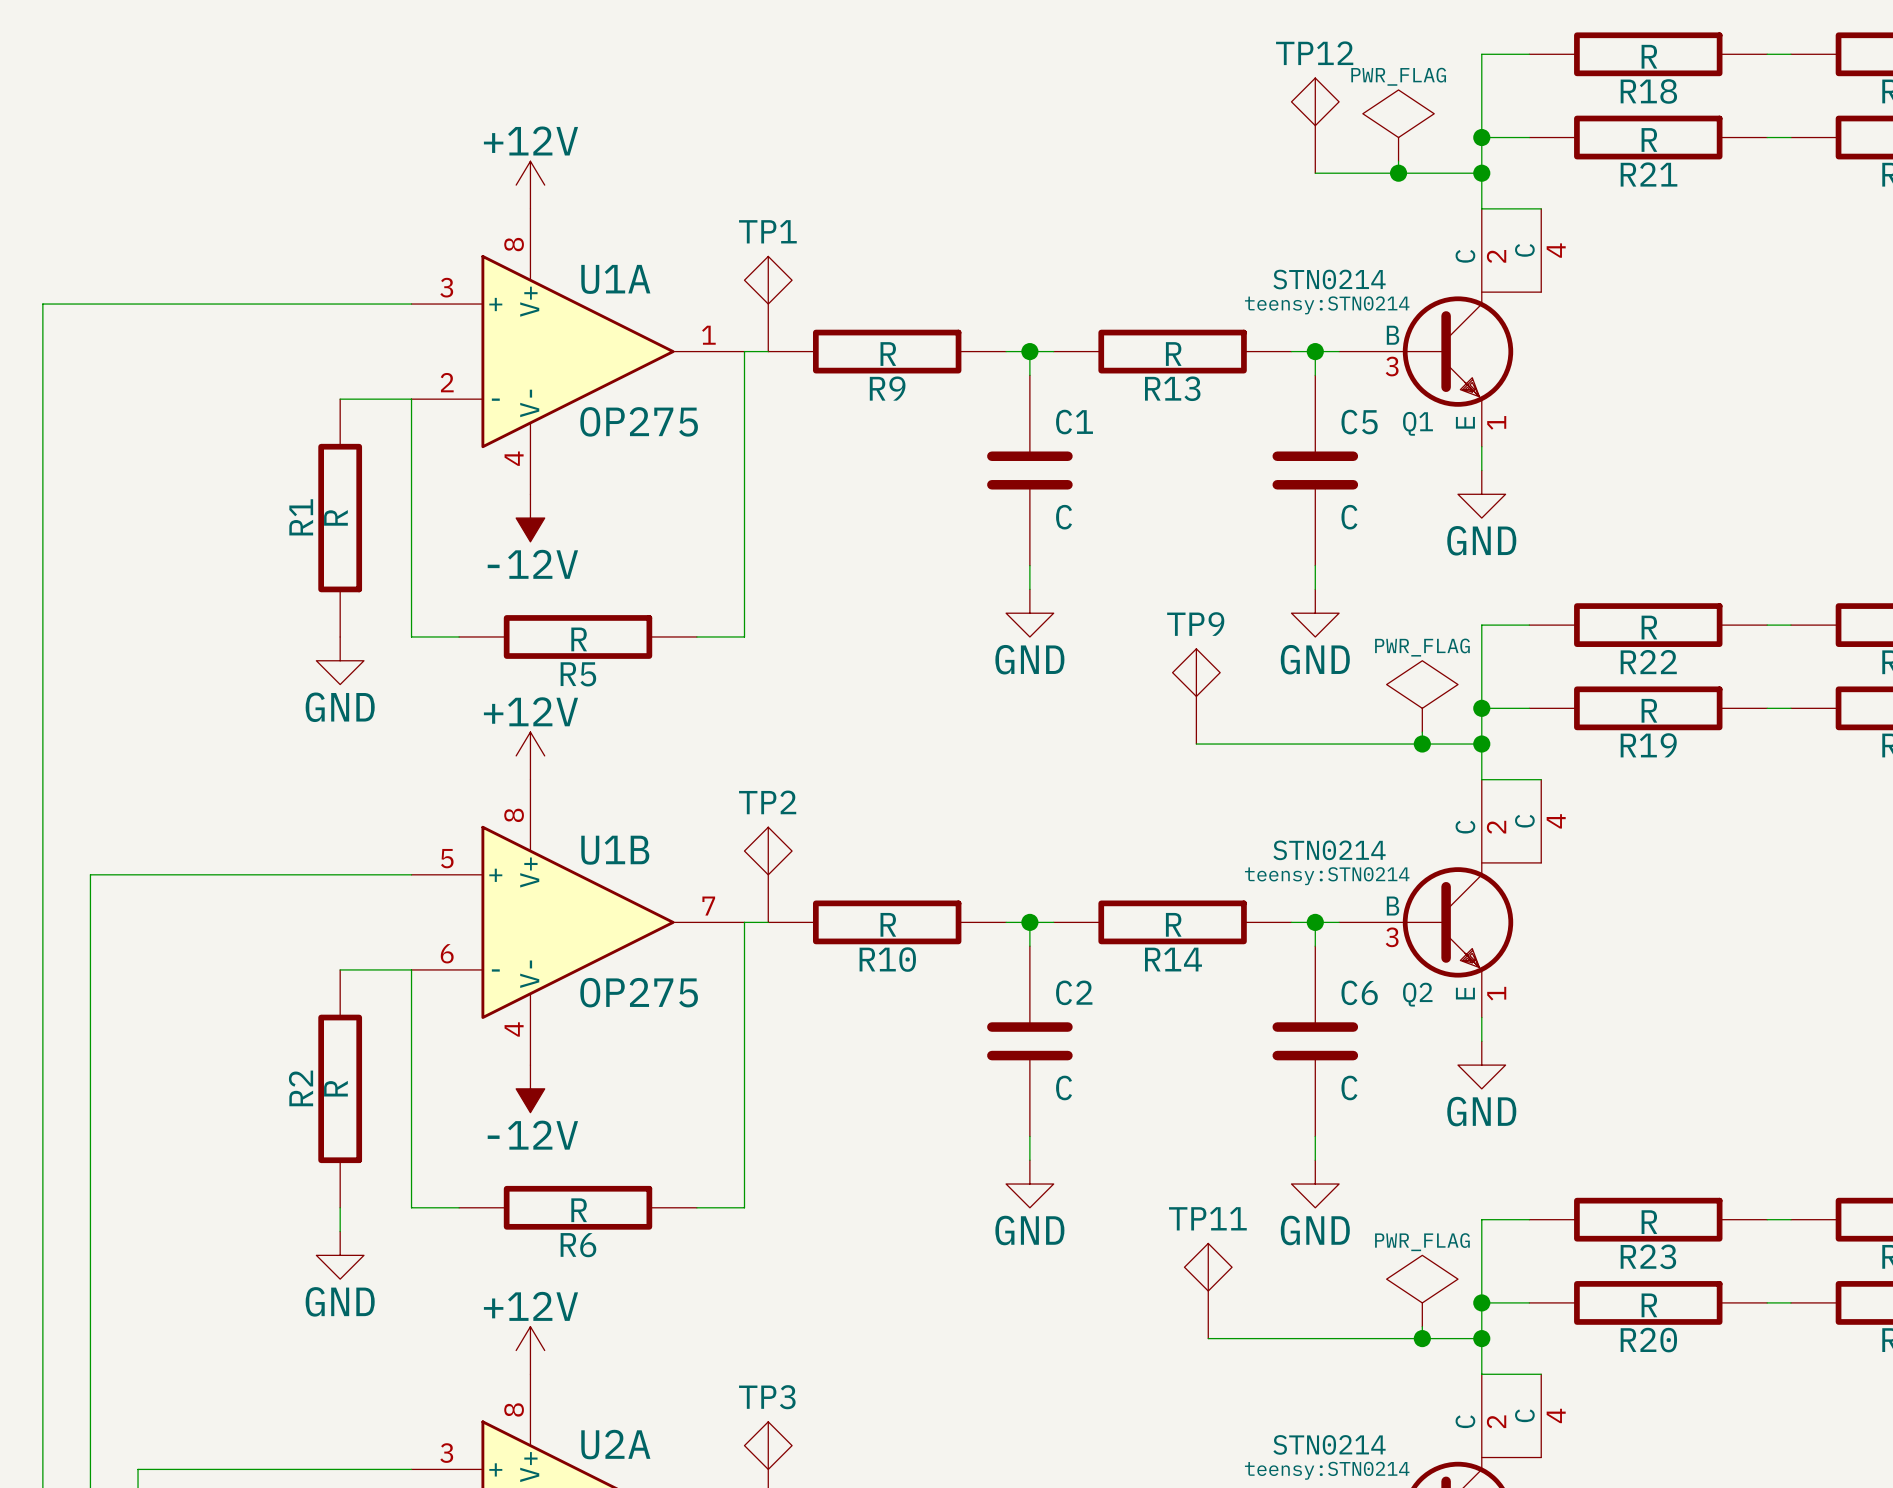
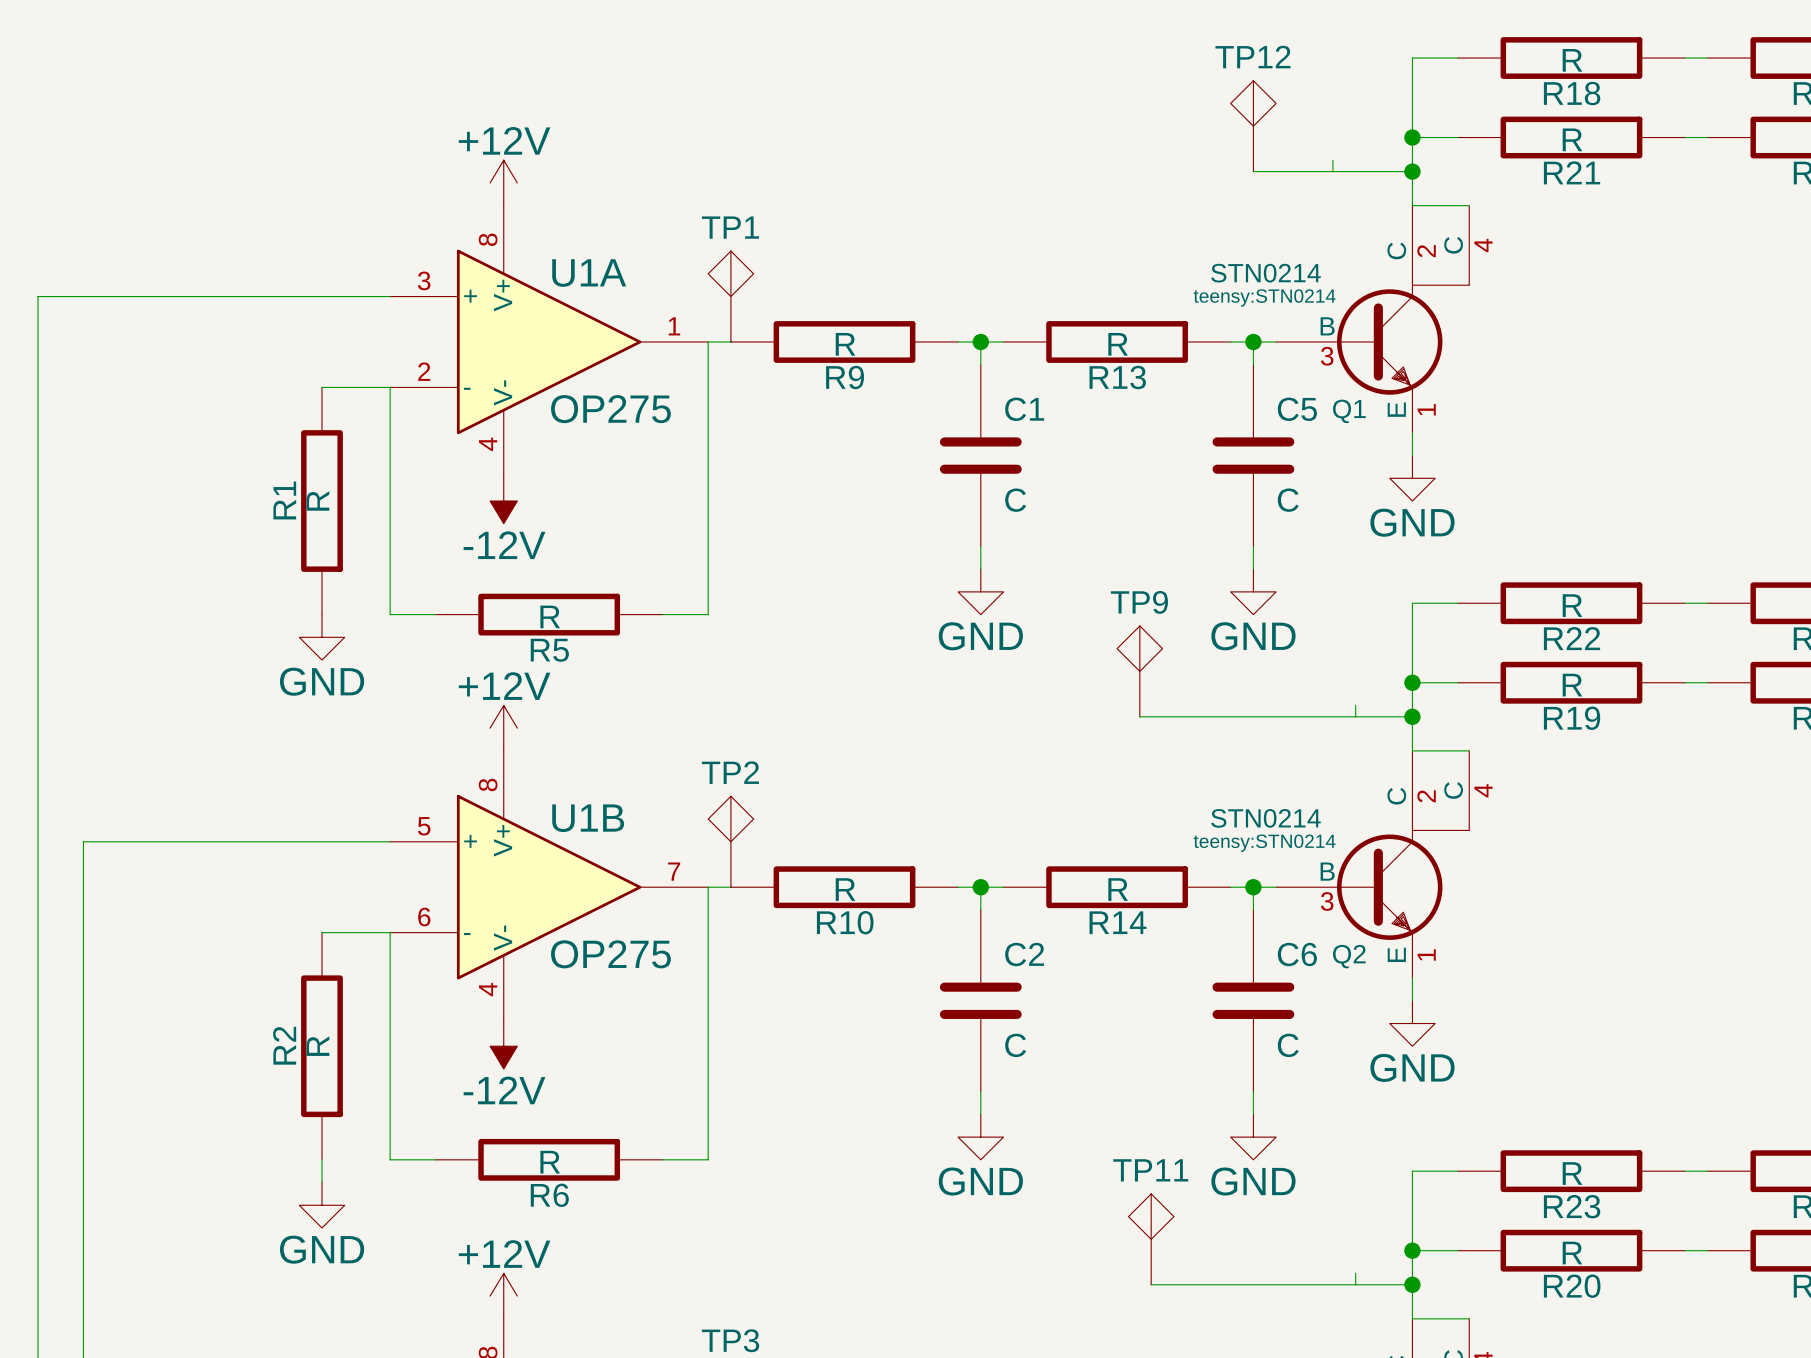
power symbol: PWR_FLAG (1398, 125) -> none
junction: (1398, 173) -> none
power symbol: PWR_FLAG (1422, 696) -> none
junction: (1422, 744) -> none
power symbol: PWR_FLAG (1422, 1291) -> none
junction: (1422, 1338) -> none

